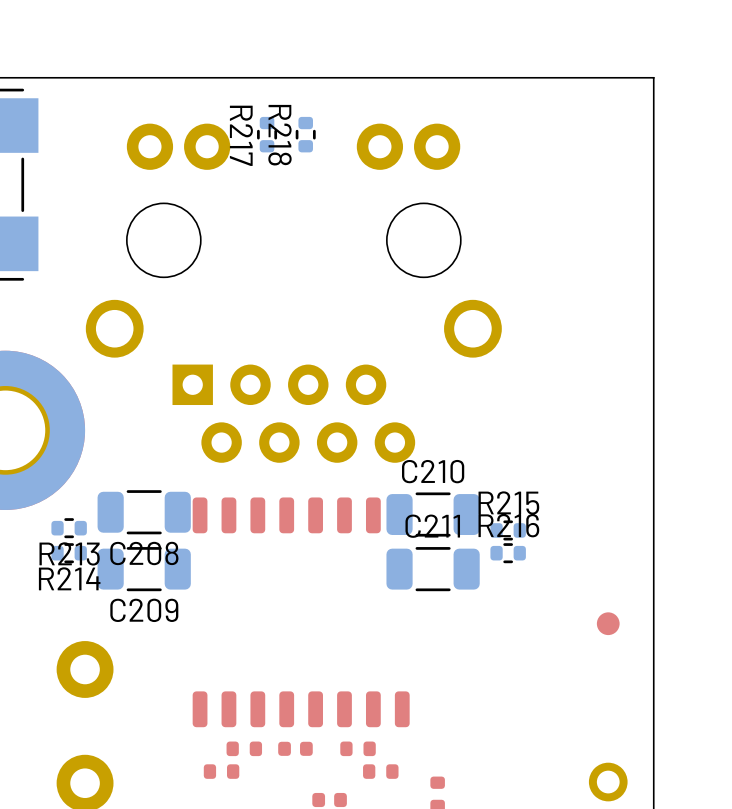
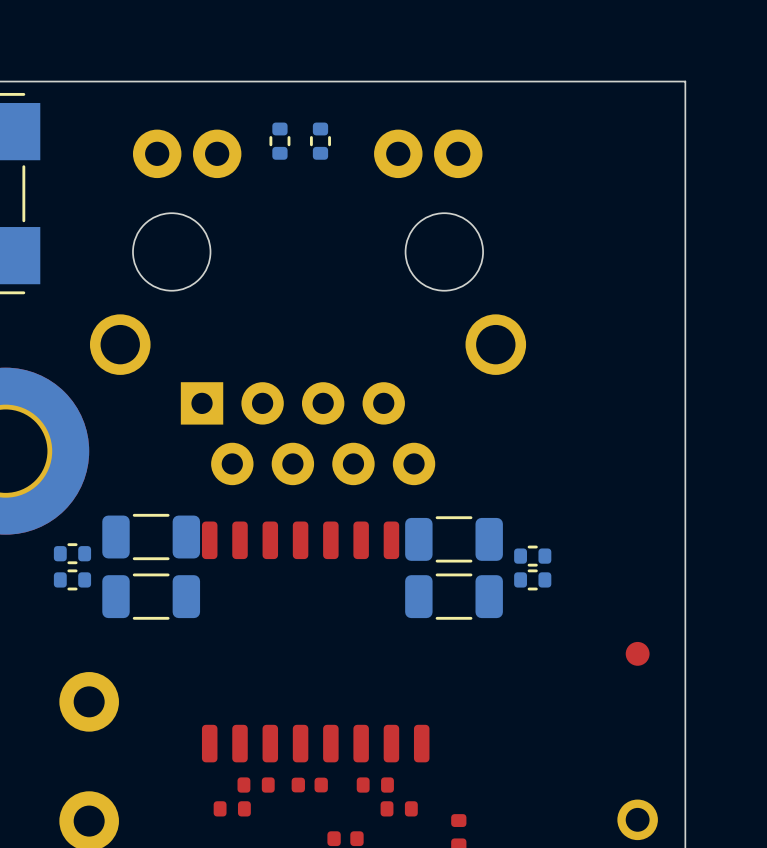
R217 name: R217 (241, 135) -> none
R218 name: R218 (279, 135) -> none
C210 name: C210 (433, 471) -> none
R215 name: R215 (508, 502) -> none
R216 name: R216 (508, 525) -> none
C211 name: C211 (432, 526) -> none
R213 name: R213 (69, 553) -> none
C208 name: C208 (144, 553) -> none
R214 name: R214 (69, 578) -> none
C209 name: C209 (144, 610) -> none

